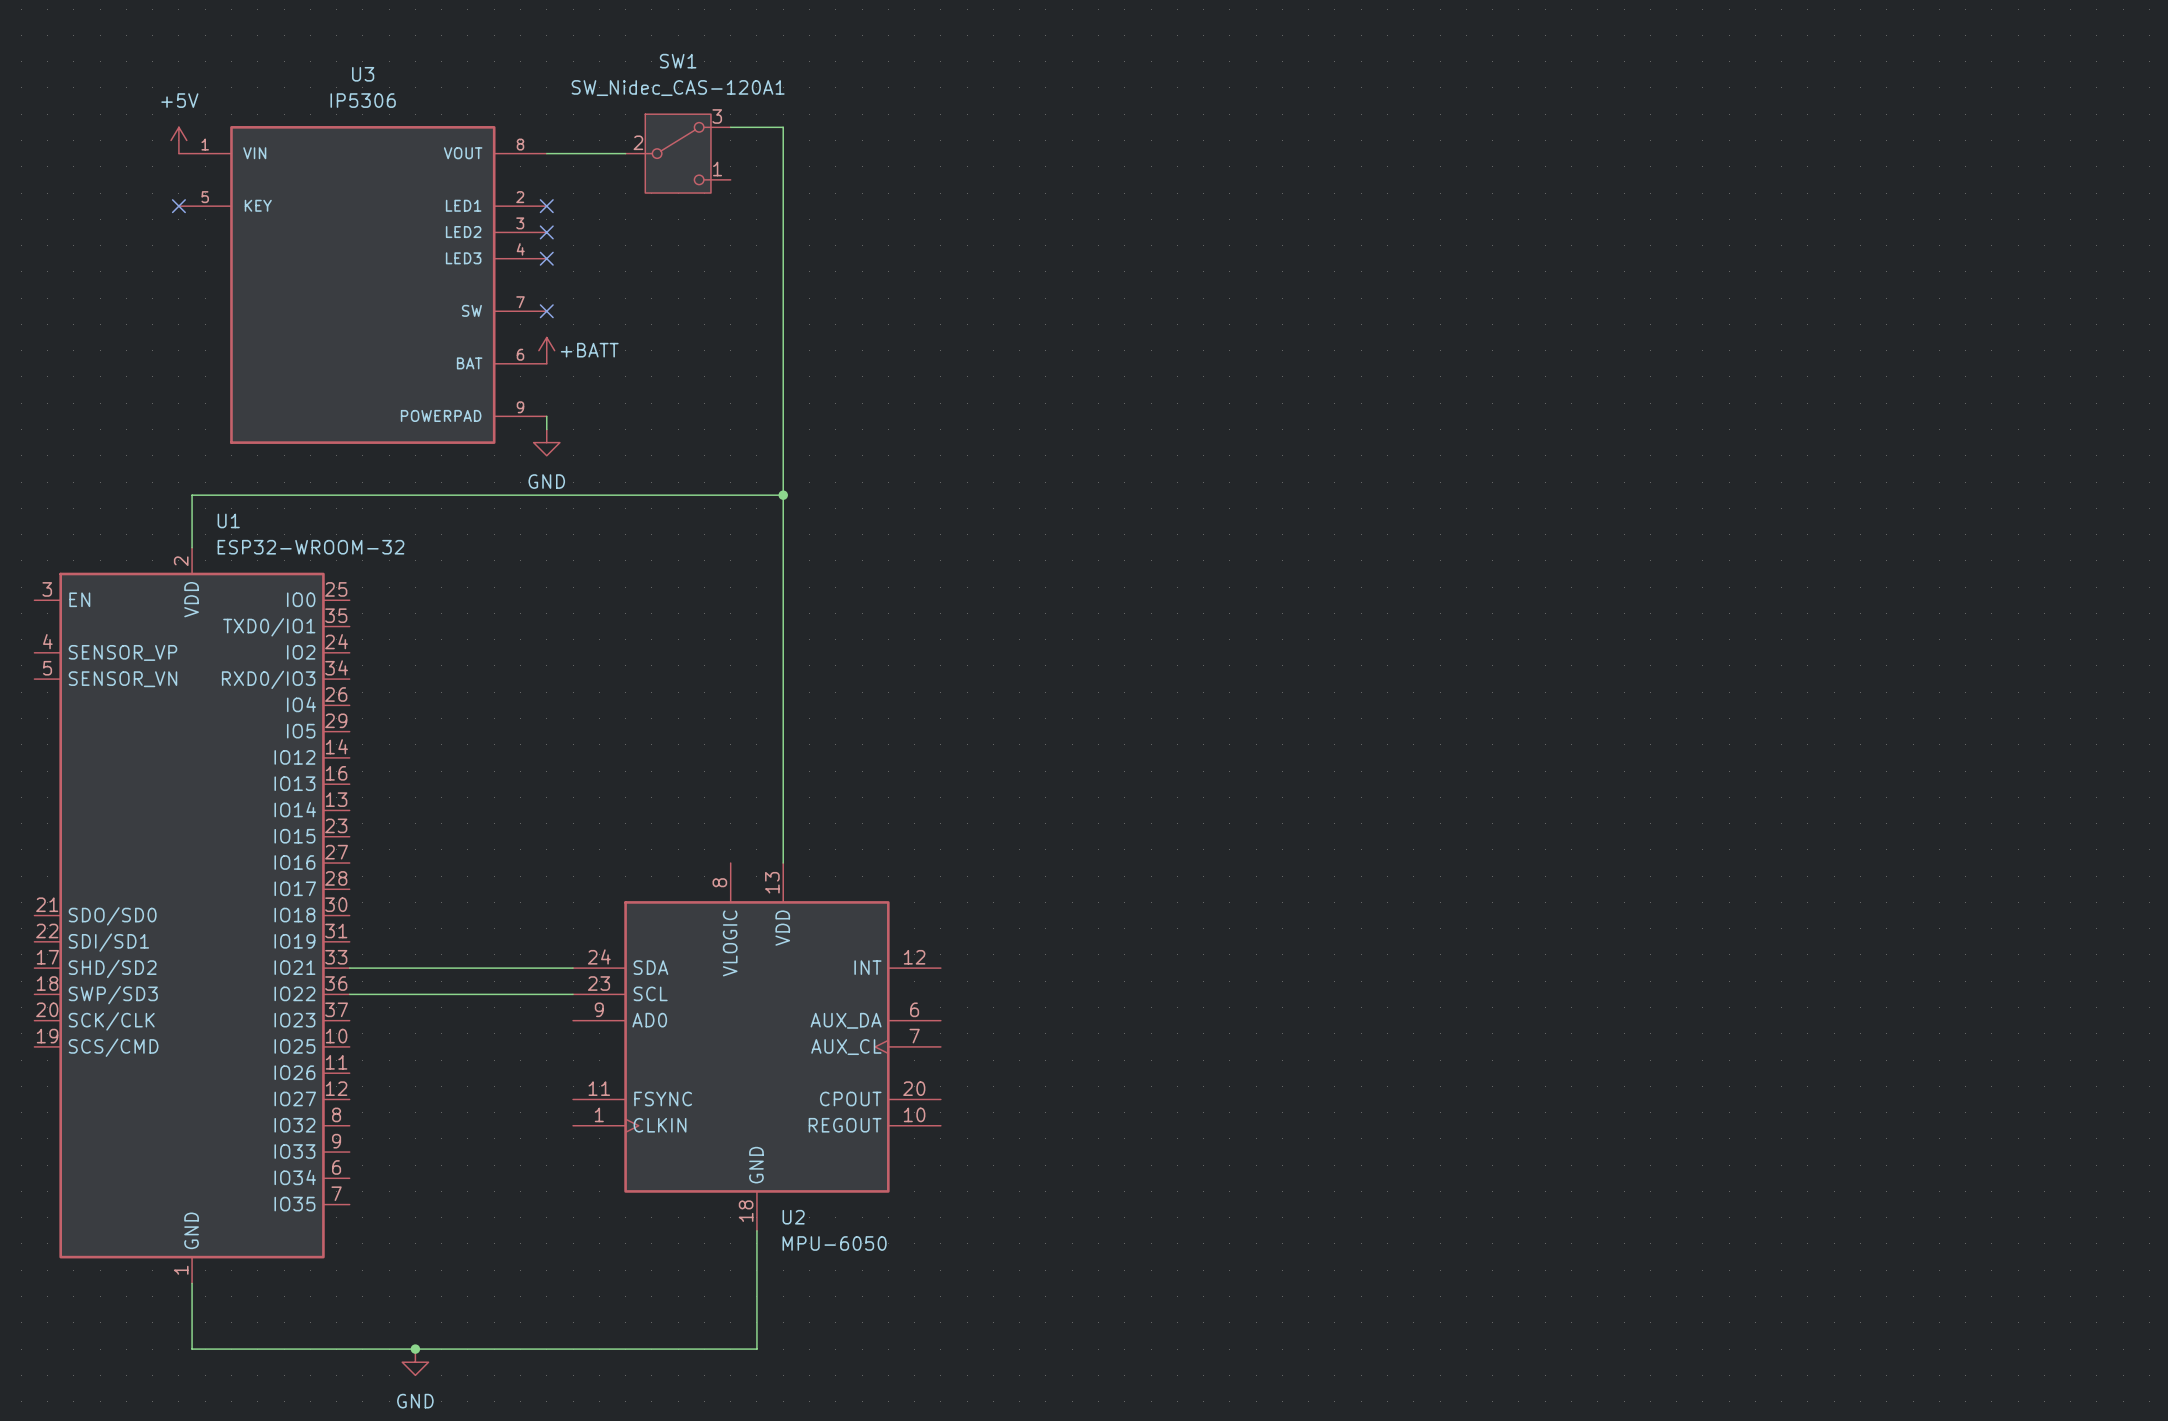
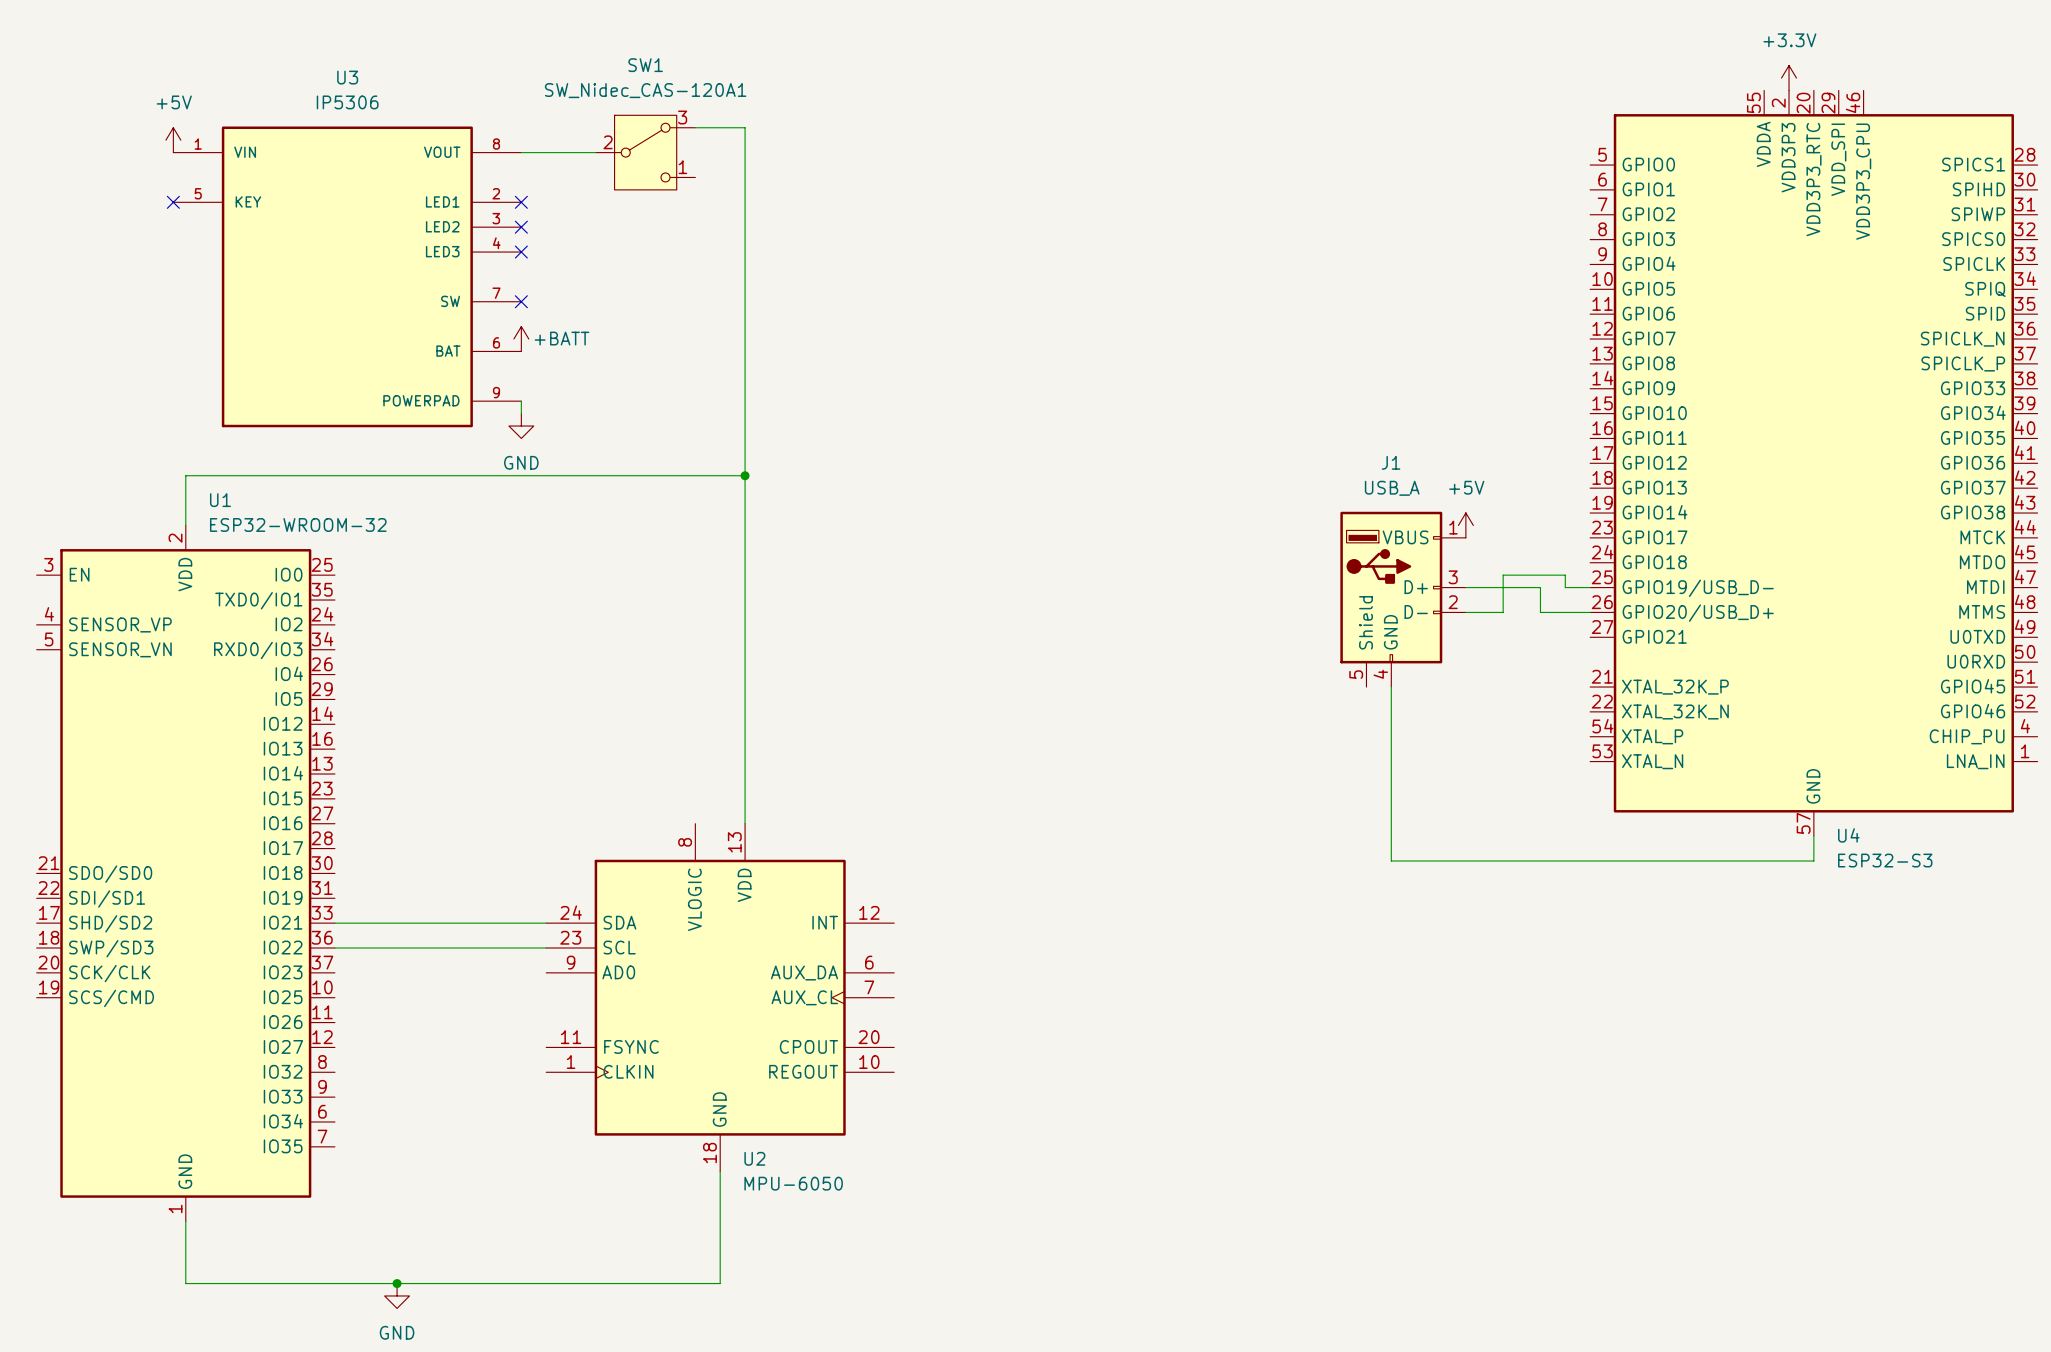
power symbol: none -> +3.3V (1789, 78)
U4: none -> ESP32-S3 (1813, 463)
power symbol: none -> +5V (1465, 525)
wire: none -> (1465, 587) (1540, 587) (1540, 612) (1590, 612)
wire: none -> (1590, 587) (1565, 587) (1565, 575) (1503, 575) (1503, 612) (1465, 612)
J1: none -> USB_A (1403, 599)
wire: none -> (1391, 687) (1391, 861) (1813, 861) (1813, 836)

